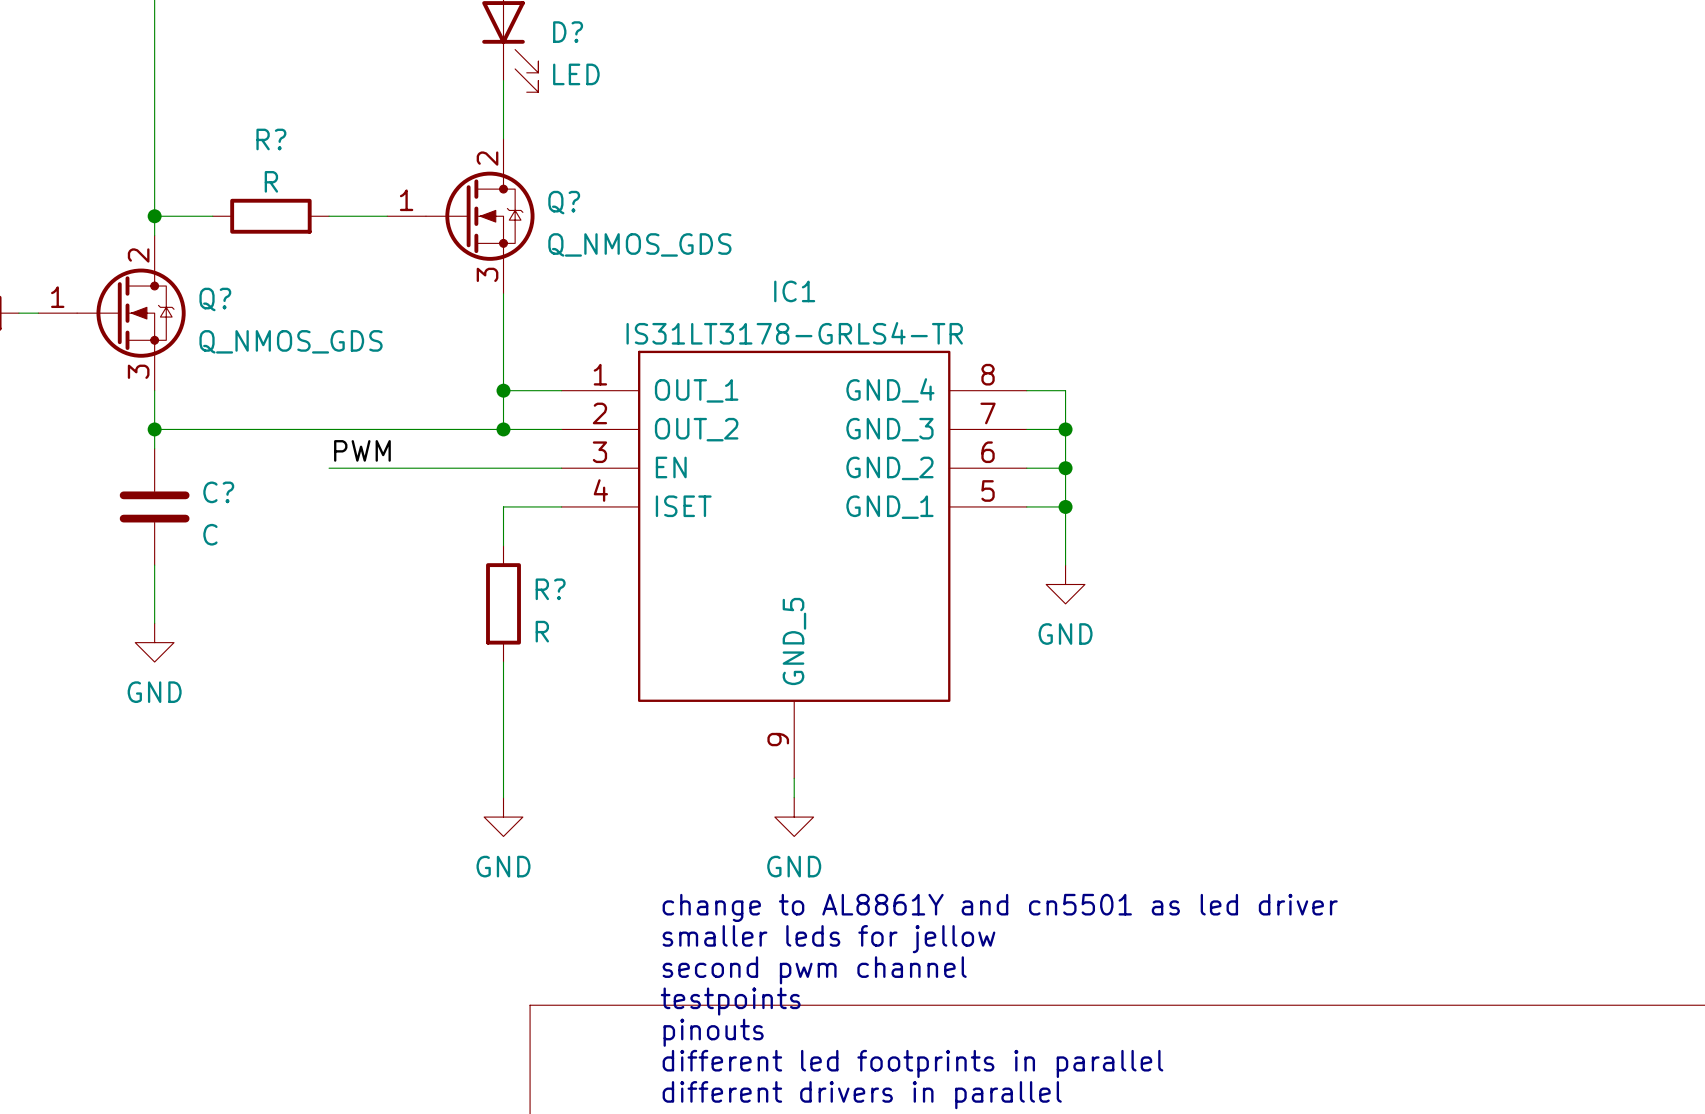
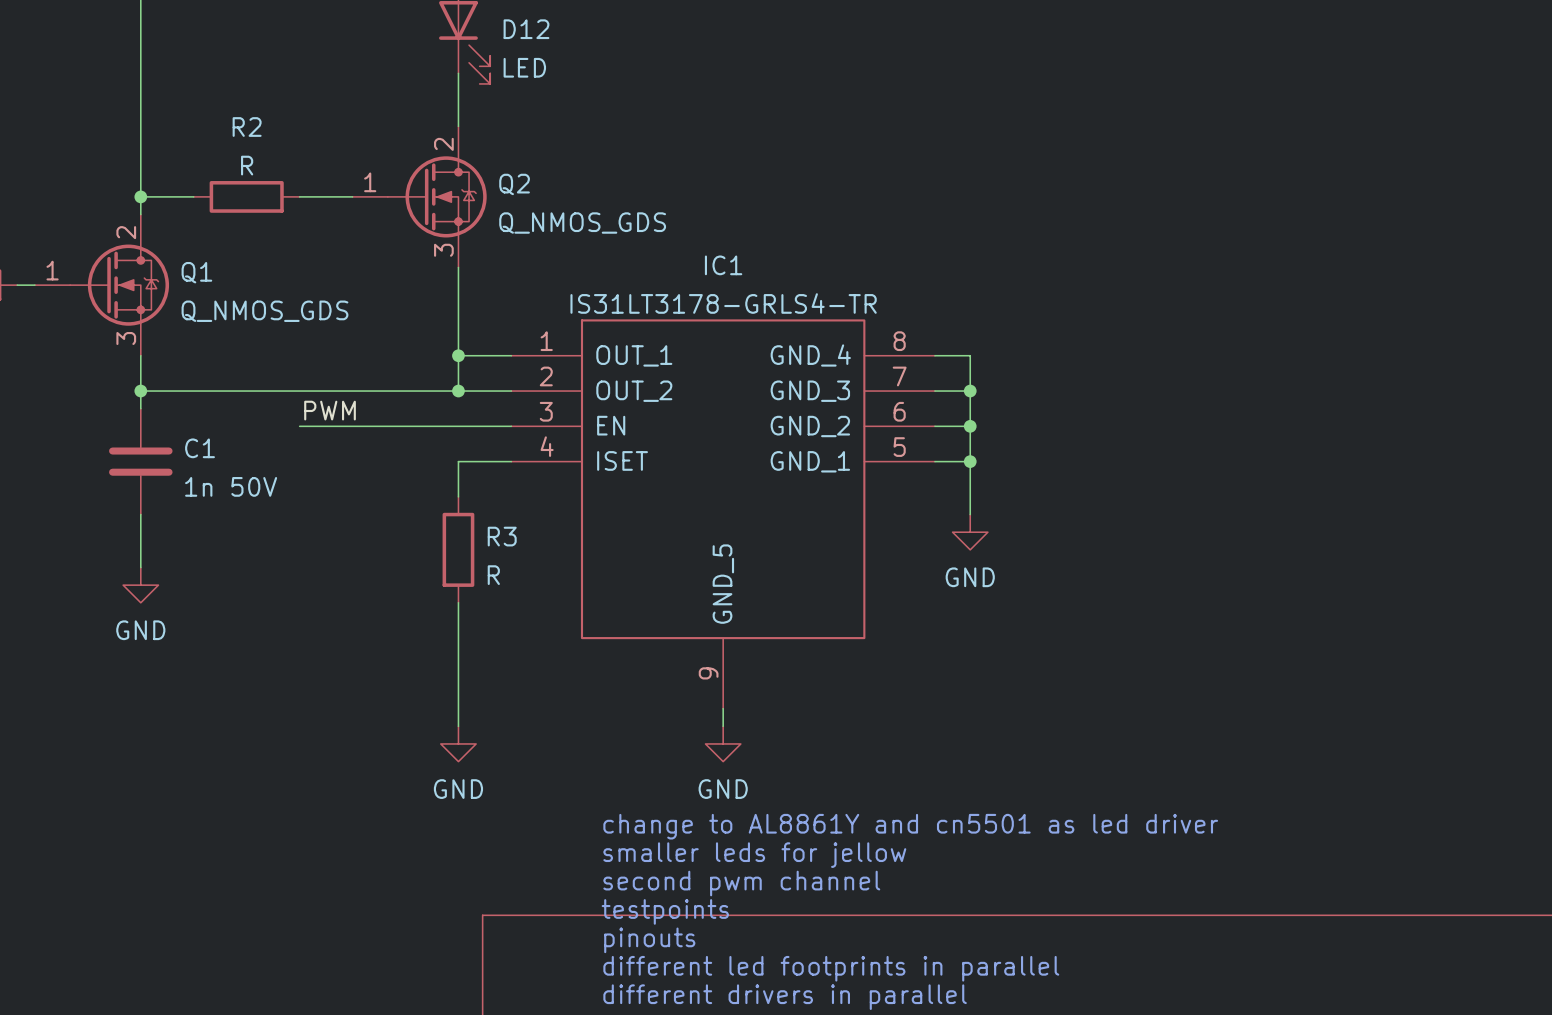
D? name: D? (568, 32) -> D12 (526, 29)
R? name: R? (271, 139) -> R2 (247, 127)
Q? name: Q? (564, 202) -> Q2 (514, 184)
Q? name: Q? (215, 299) -> Q1 (196, 272)
C? name: C? (218, 492) -> C1 (200, 448)
C? value: C (210, 534) -> 1n 50V (231, 486)
R? name: R? (550, 589) -> R3 (502, 536)

